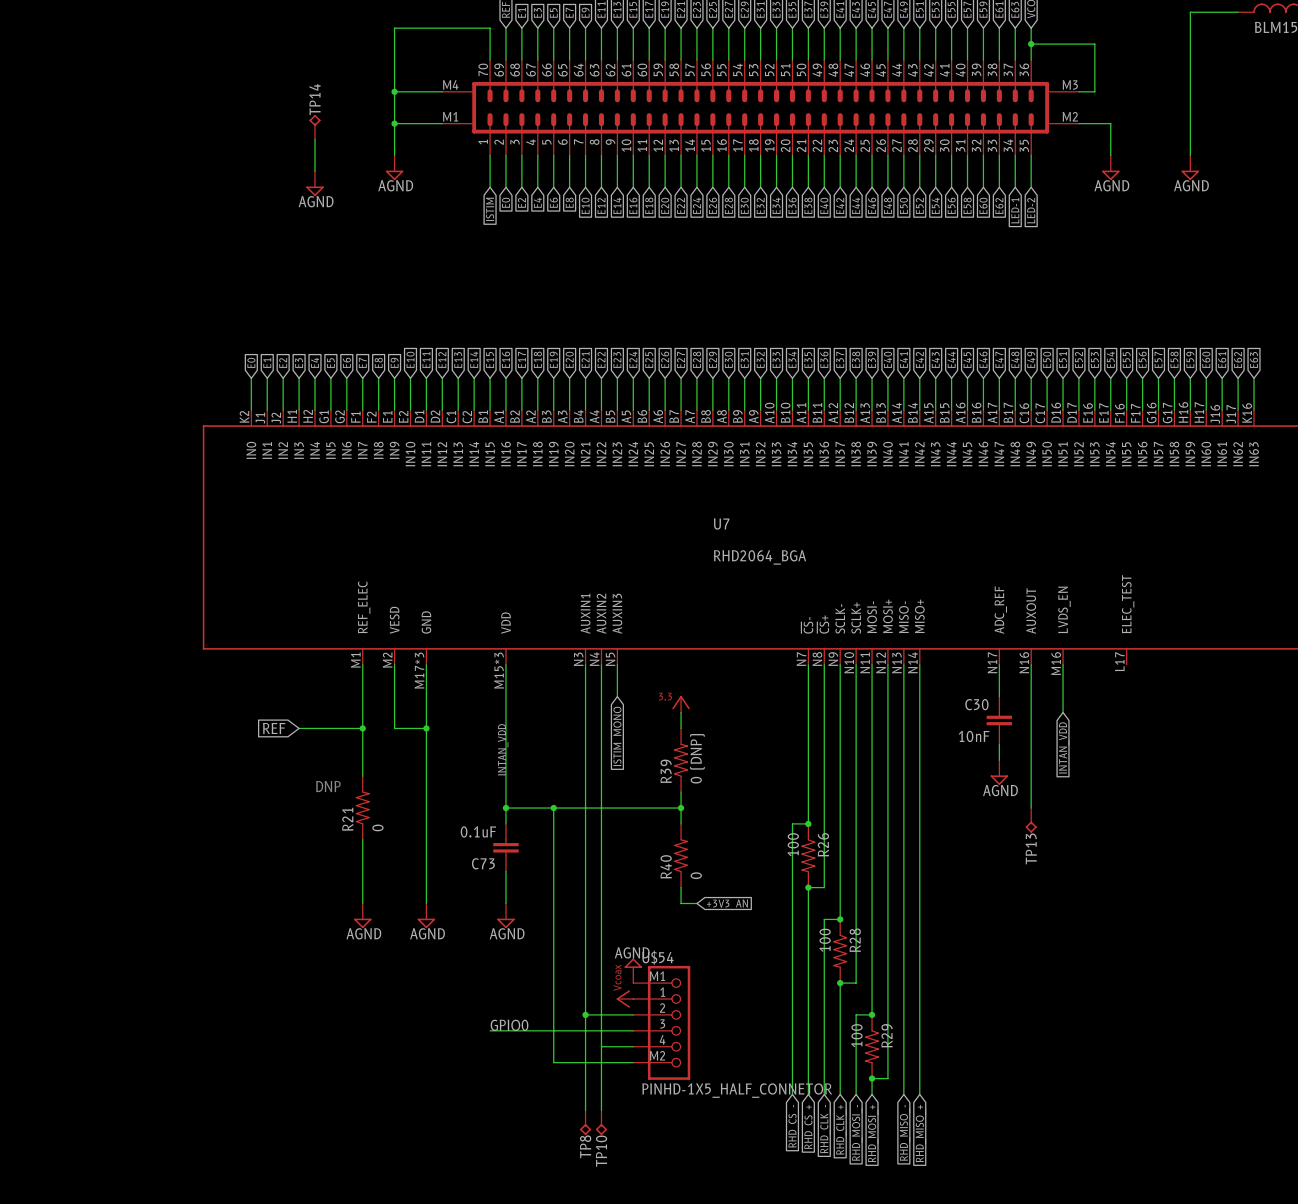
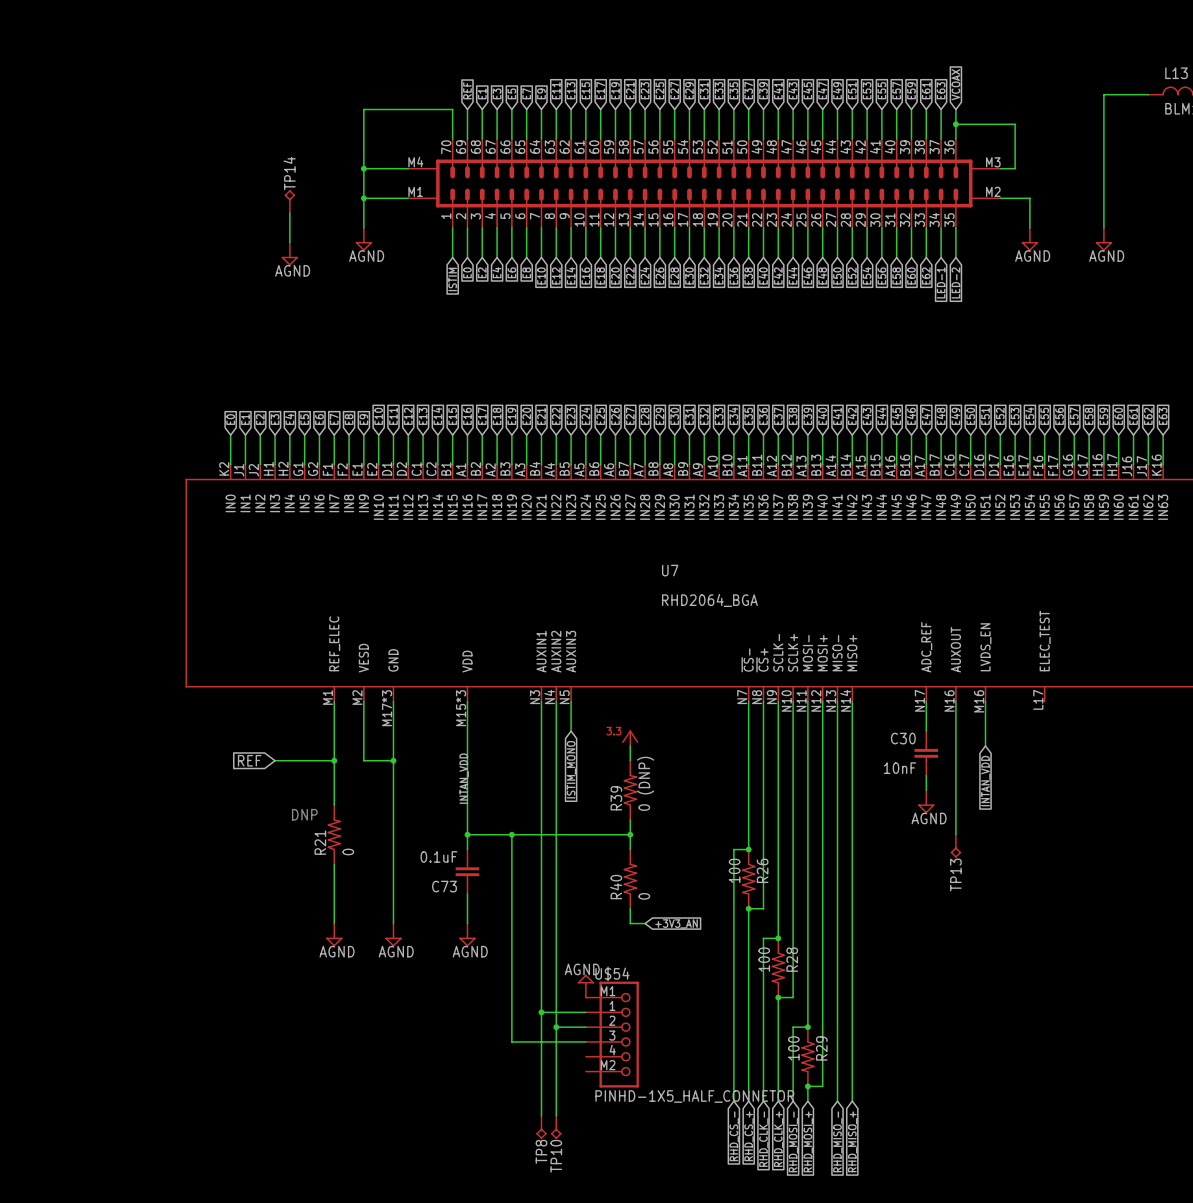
wire: none -> (541, 1012) (585, 1012)
junction: none -> (541, 1012)
power symbol: (624, 999) -> none
wire: (585, 1014) (601, 1014) -> none
junction: (585, 1014) -> none
junction: none -> (556, 1027)
label: GPIO0 (509, 1025) -> none
wire: (490, 1030) (553, 1030) (553, 1062) (633, 1062) -> none
wire: (601, 1046) (633, 1046) -> none

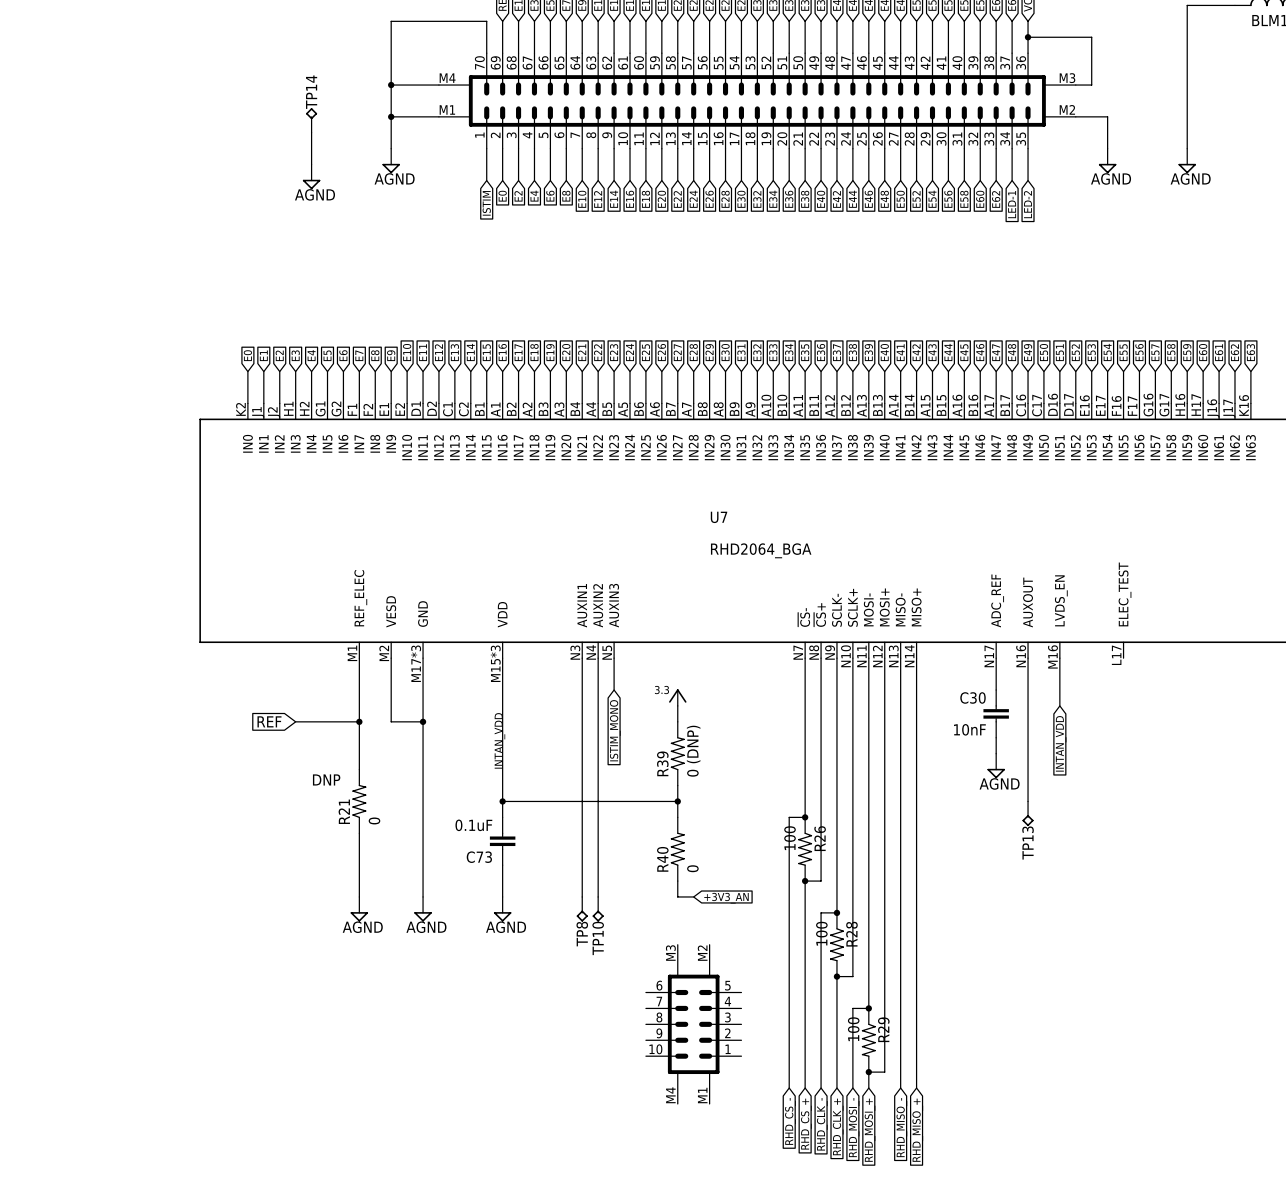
wire: (511, 834) (511, 1041) (585, 1041) -> none
junction: (511, 834) -> none
wire: (541, 923) (541, 1115) -> none
wire: (556, 923) (556, 1115) -> none
power symbol: AGND (585, 986) -> none
wire: (541, 1012) (585, 1012) -> none
junction: (541, 1012) -> none
wire: (556, 1027) (585, 1027) -> none
junction: (556, 1027) -> none
U$54: PINHD-1X5_HALF_CONNETOR (612, 1034) -> none
part: none -> (693, 1024)
TP8 position: (541, 1127) -> (582, 909)
TP10 position: (556, 1127) -> (598, 909)

